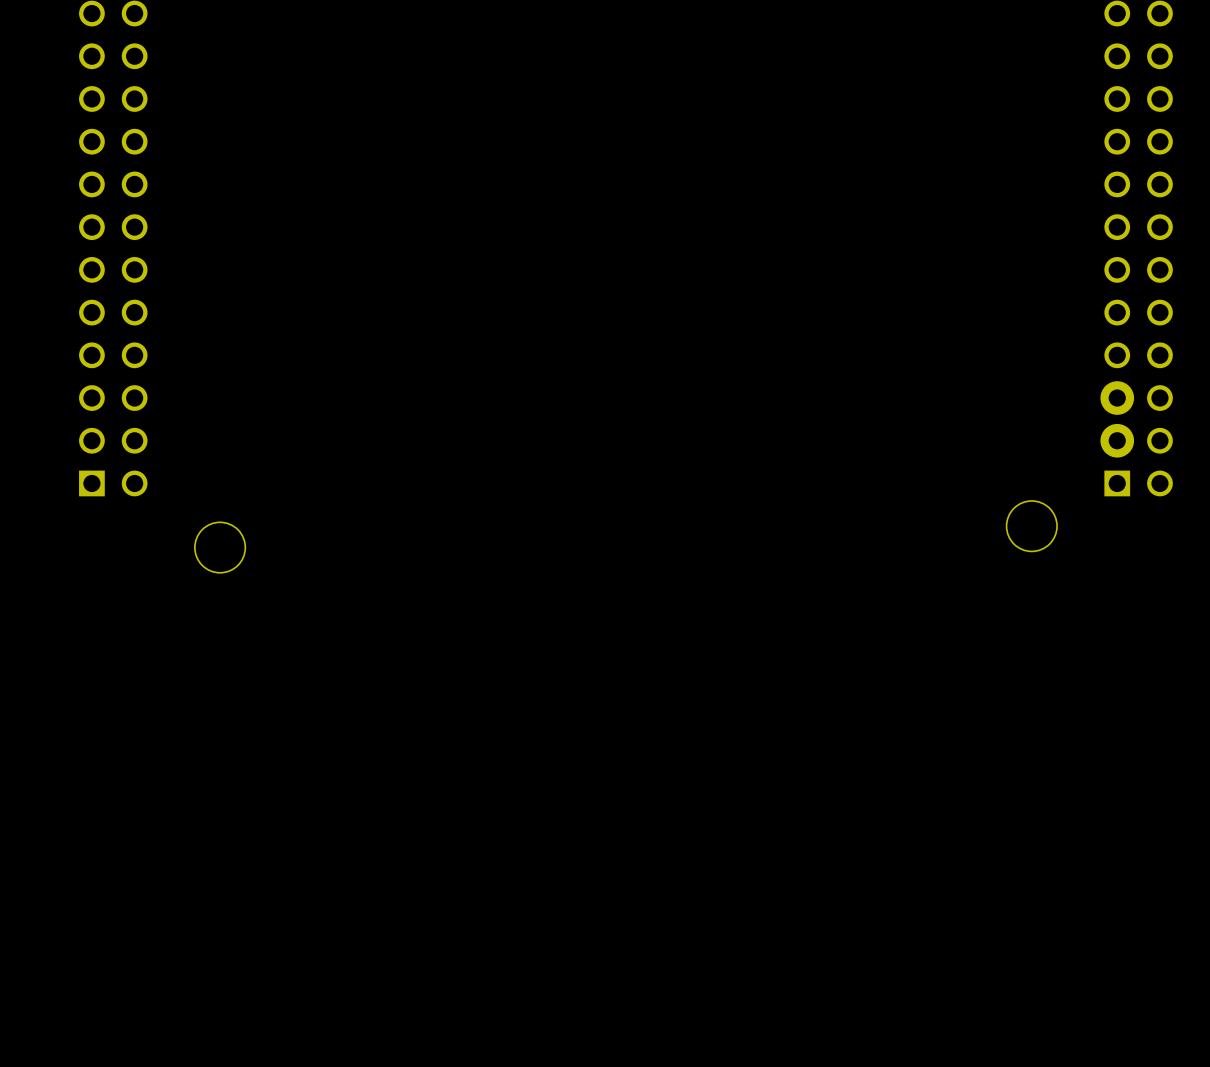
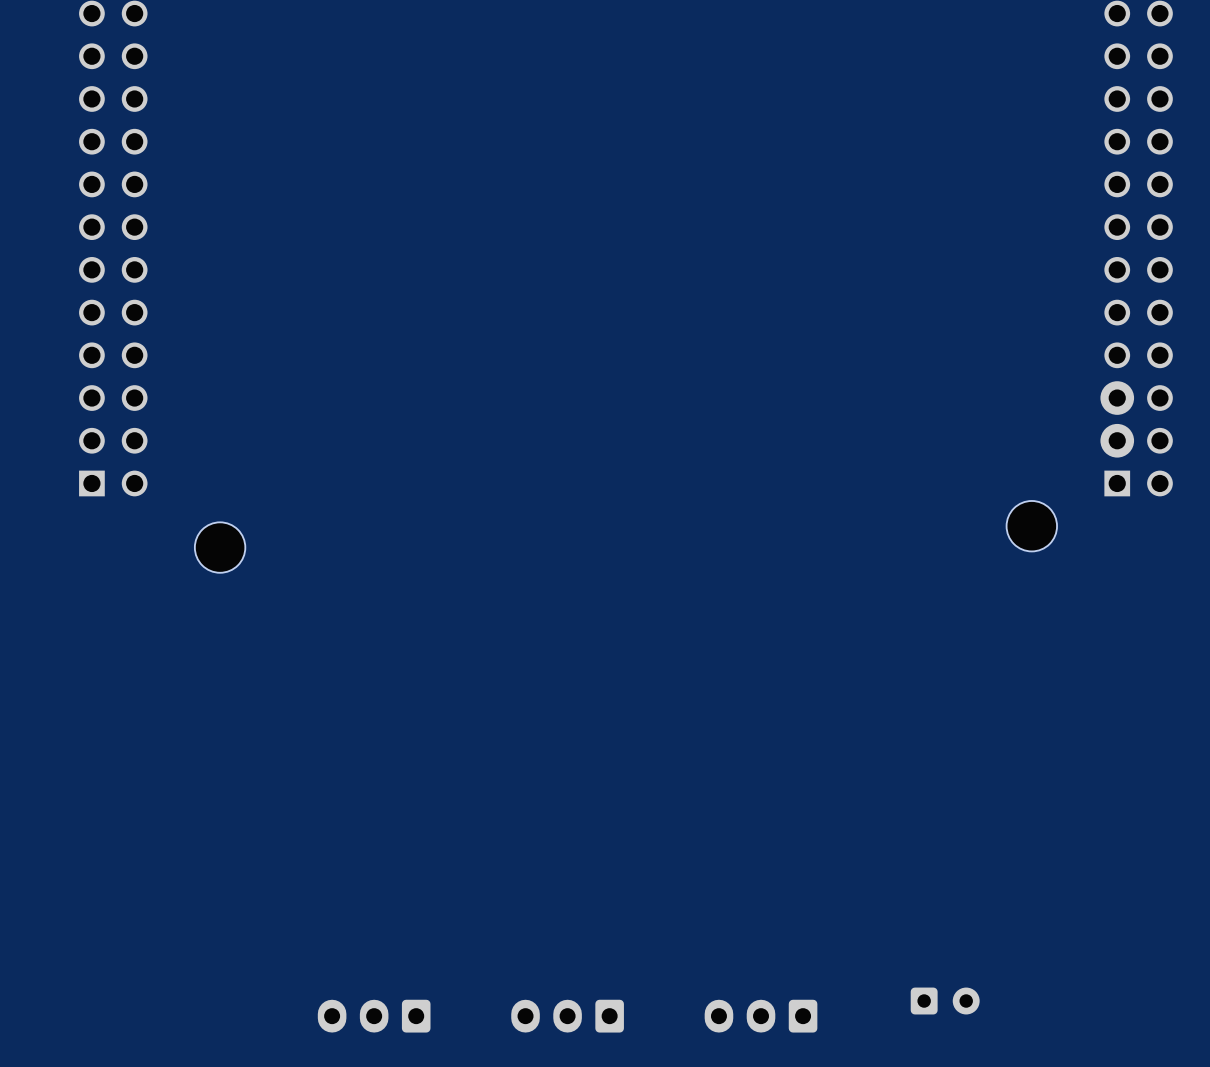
part: none -> (945, 1001)
part: none -> (374, 1016)
part: none -> (567, 1016)
part: none -> (761, 1016)

